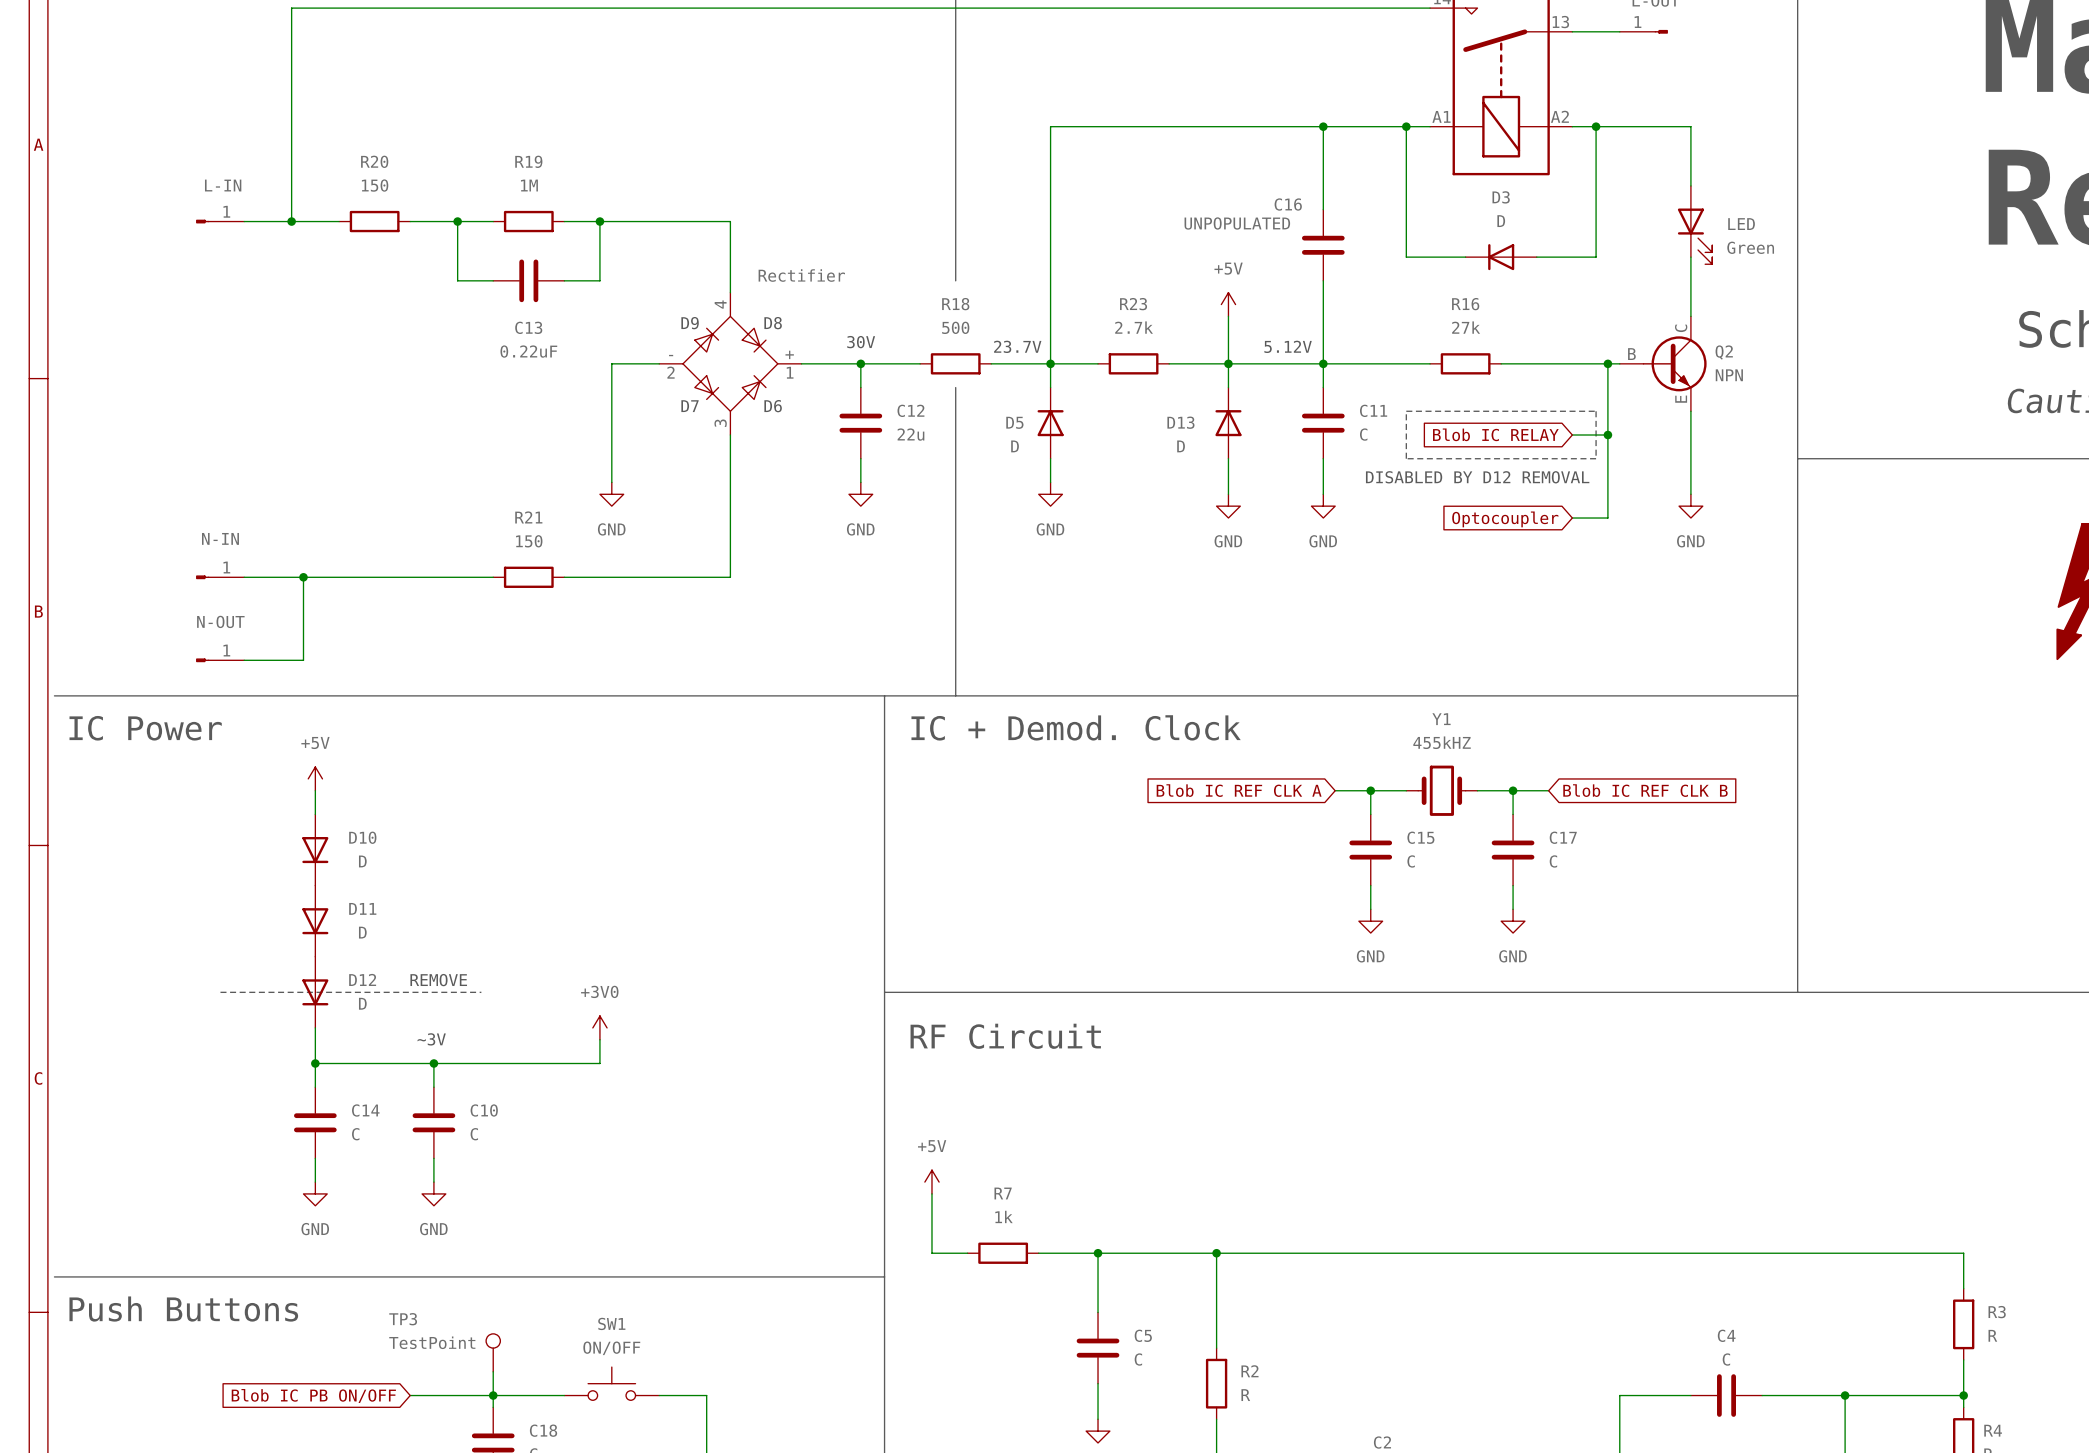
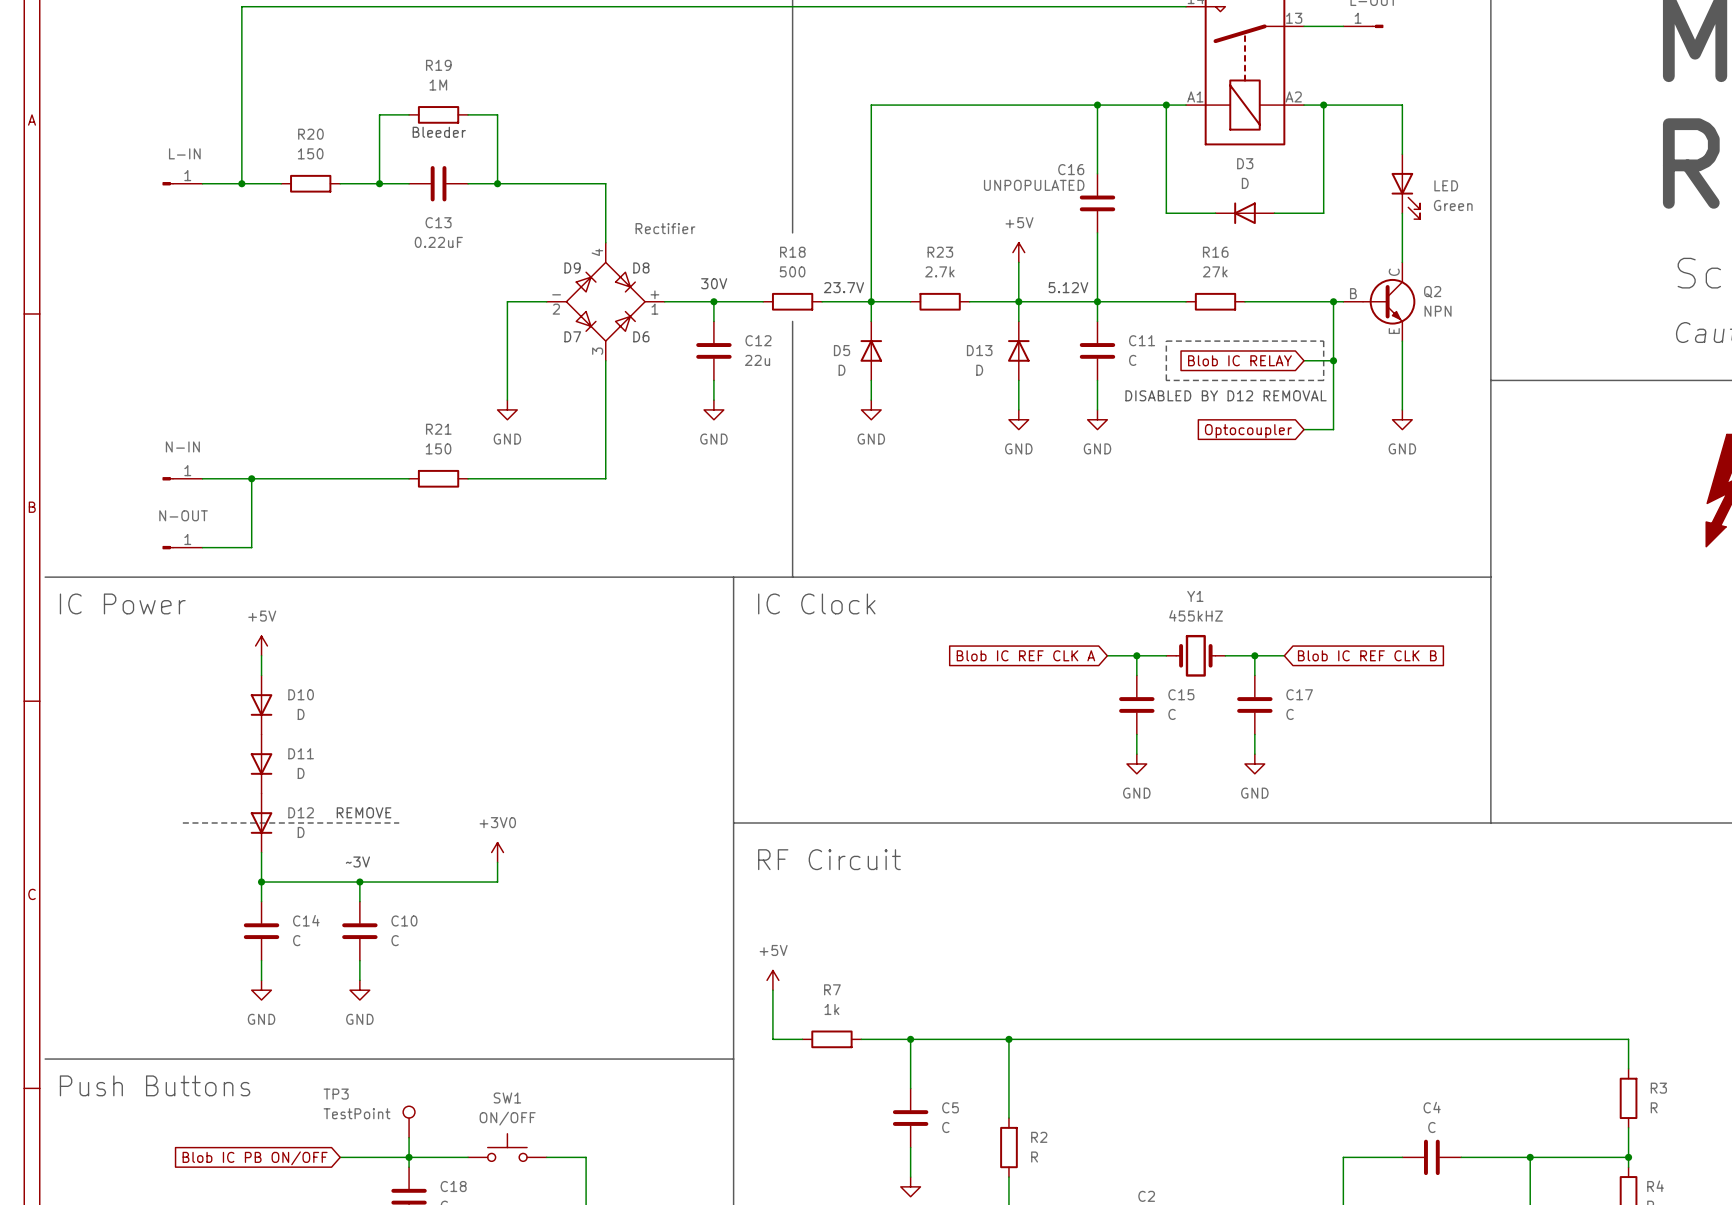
text: none -> Bleeder (439, 132)
wire: (457, 221) (457, 280) (493, 280) -> (379, 183) (379, 114) (409, 114)
R19 position: (528, 221) -> (438, 114)
wire: (599, 221) (599, 280) (564, 280) -> (497, 183) (497, 114) (468, 114)
C13 position: (528, 280) -> (438, 183)
text: IC + Demod. Clock (1076, 727) -> IC Clock (816, 603)

